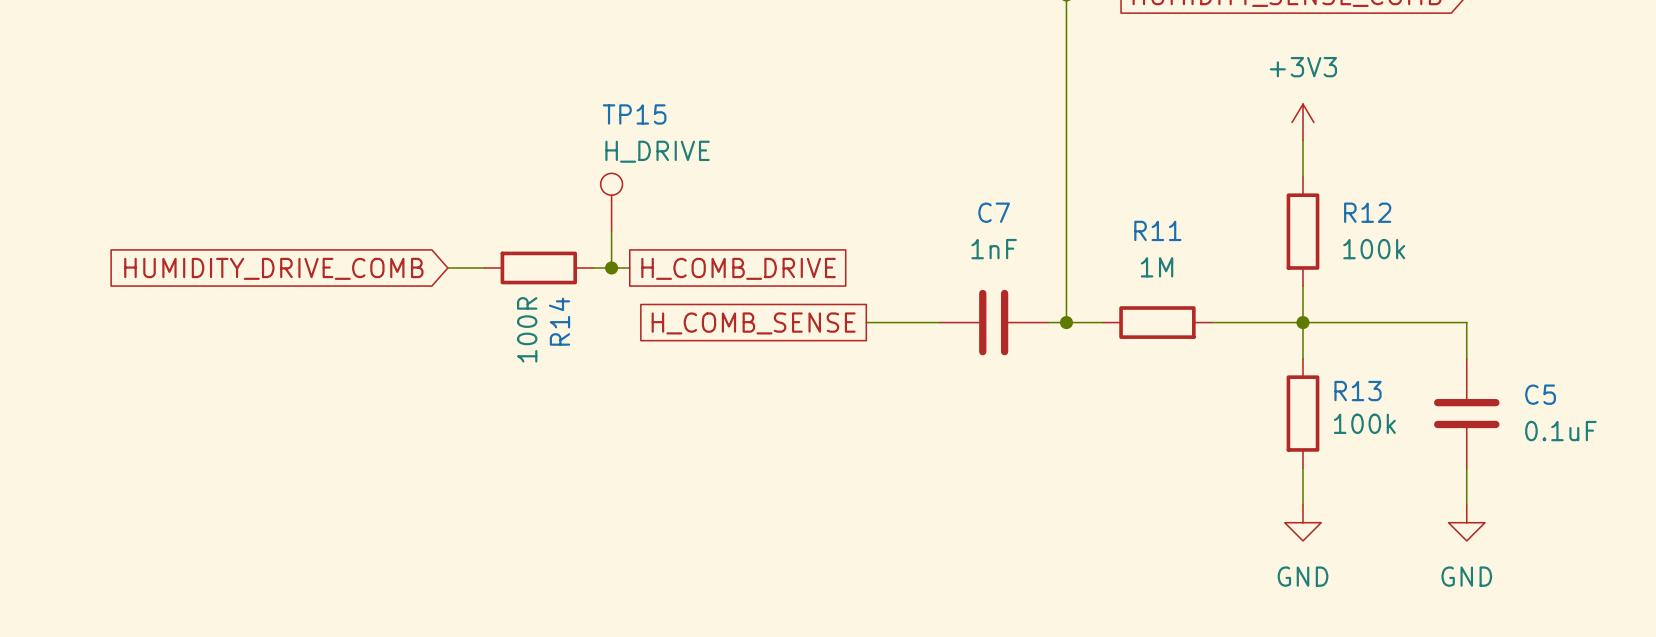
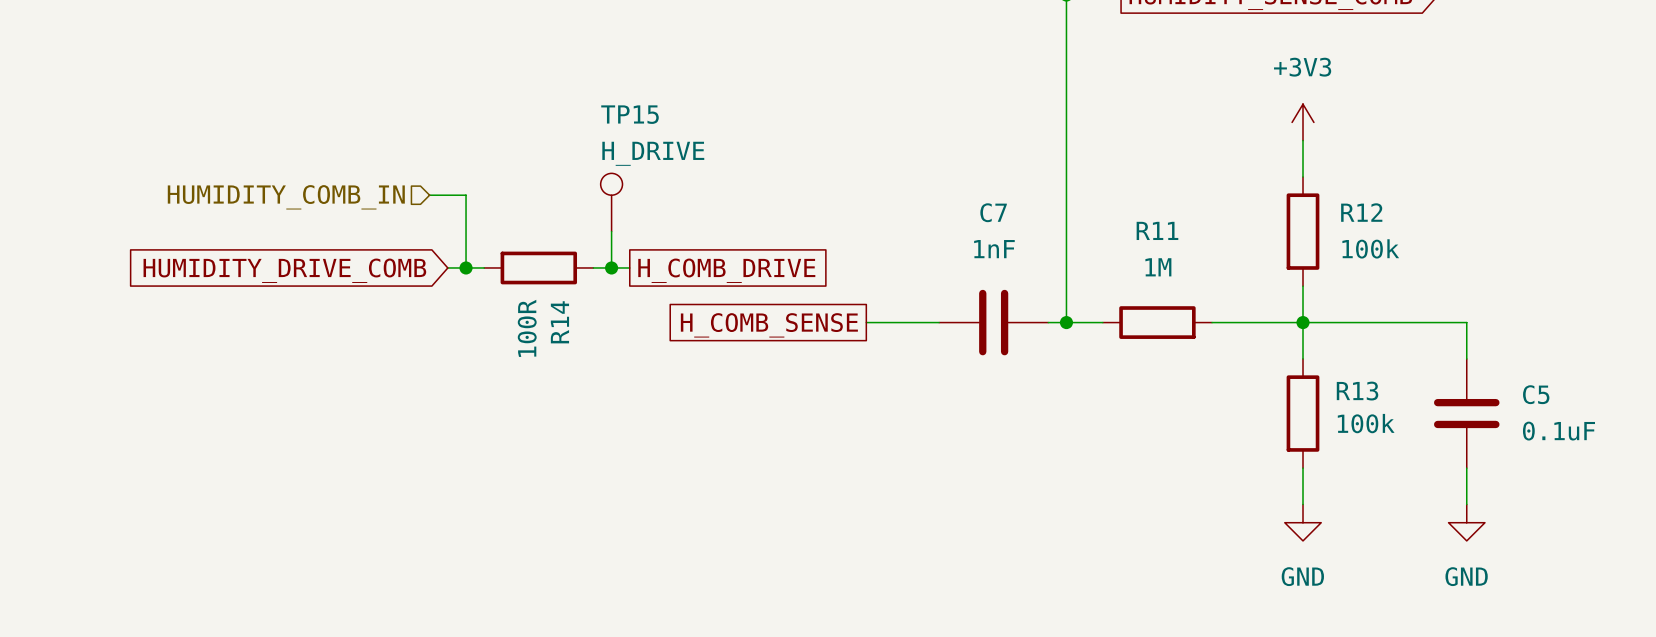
hierarchical label: none -> HUMIDITY_COMB_IN (286, 197)
wire: none -> (429, 195) (466, 195) (466, 267)
junction: none -> (466, 267)

